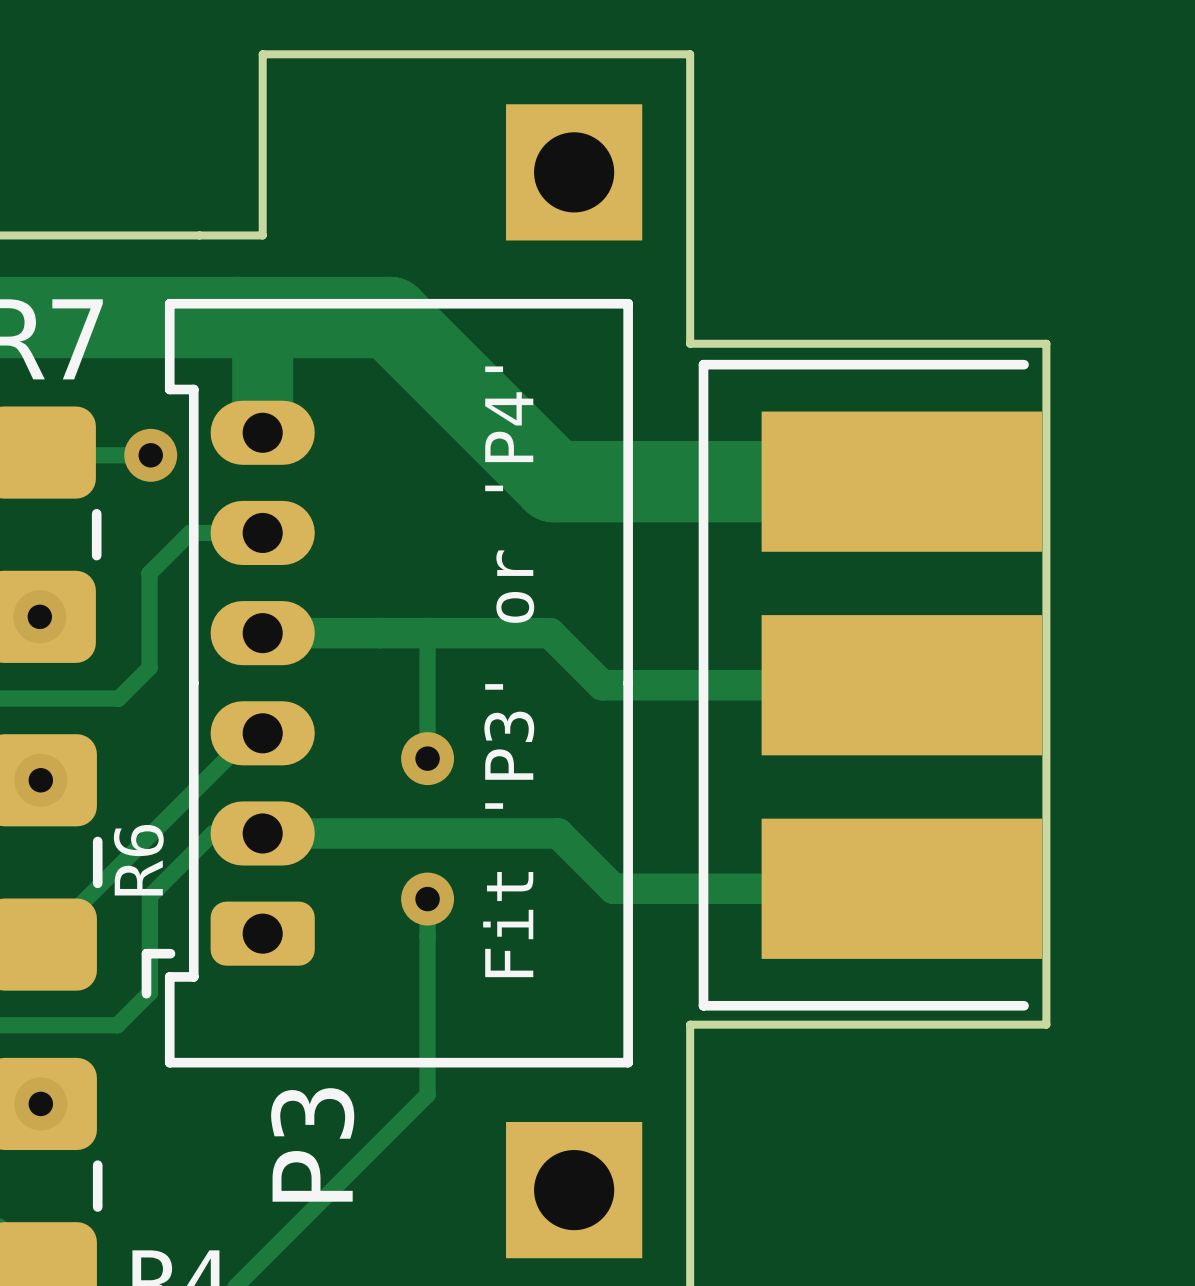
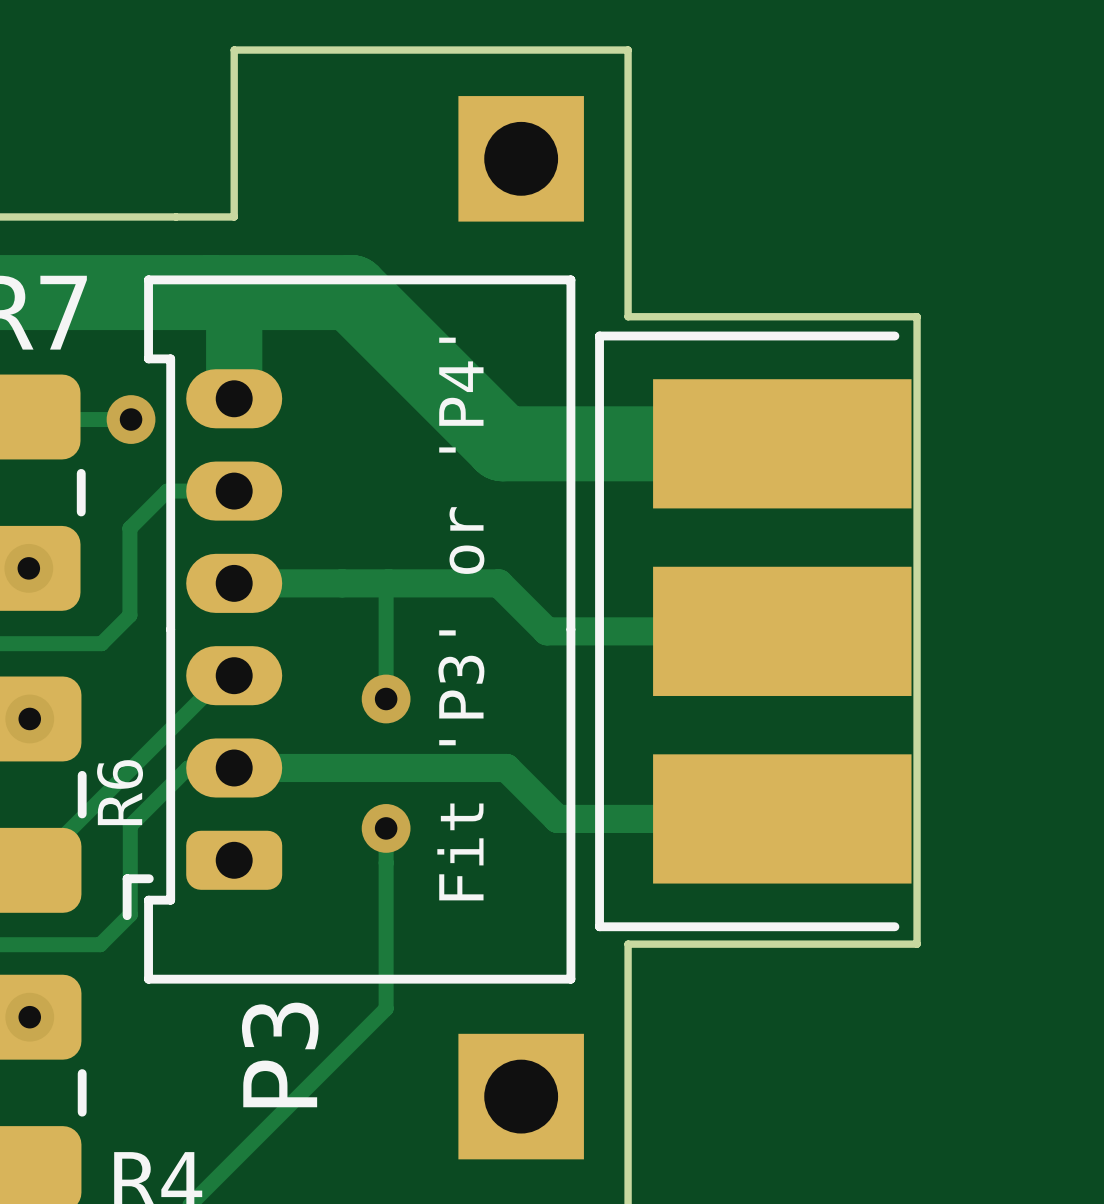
board edge: (1003, 343) (1046, 343) (1046, 1024) (1003, 1024) -> (917, 316) (917, 944)
part position: (870, 685) -> (753, 631)

